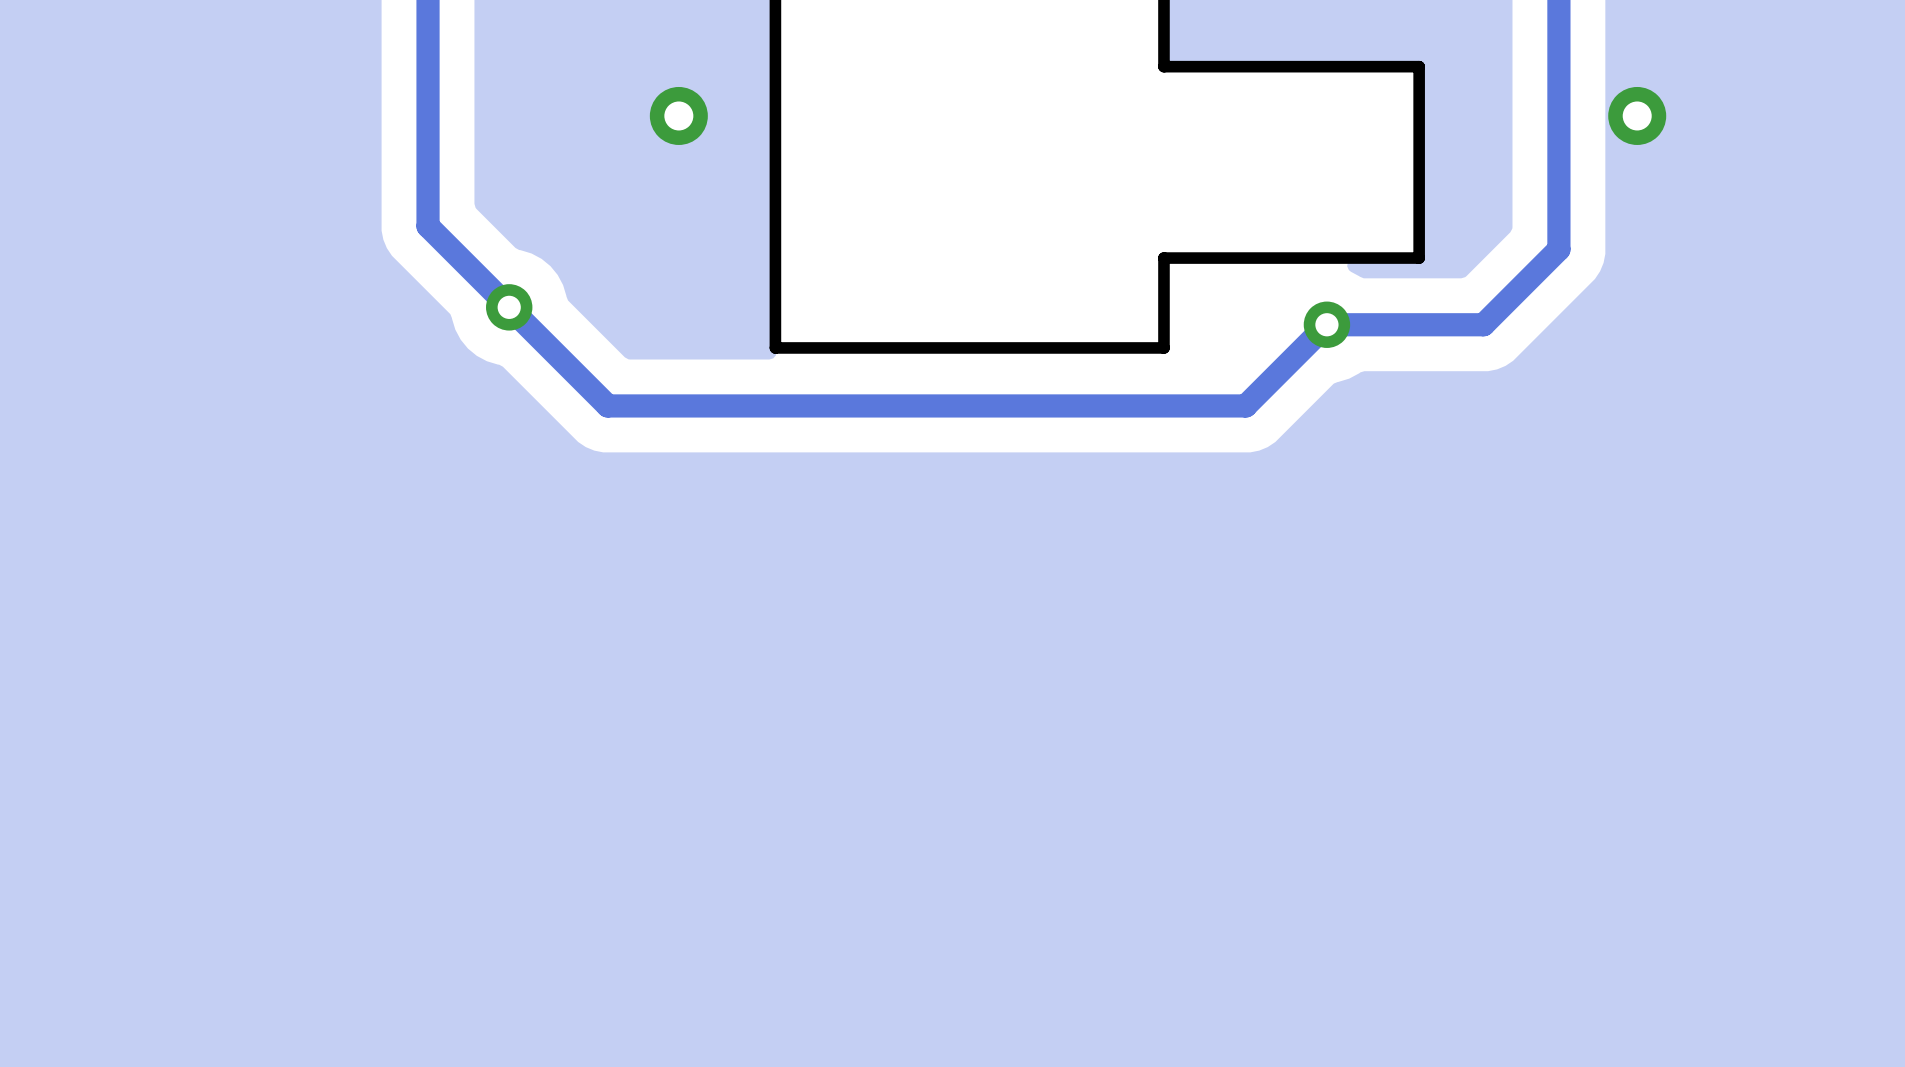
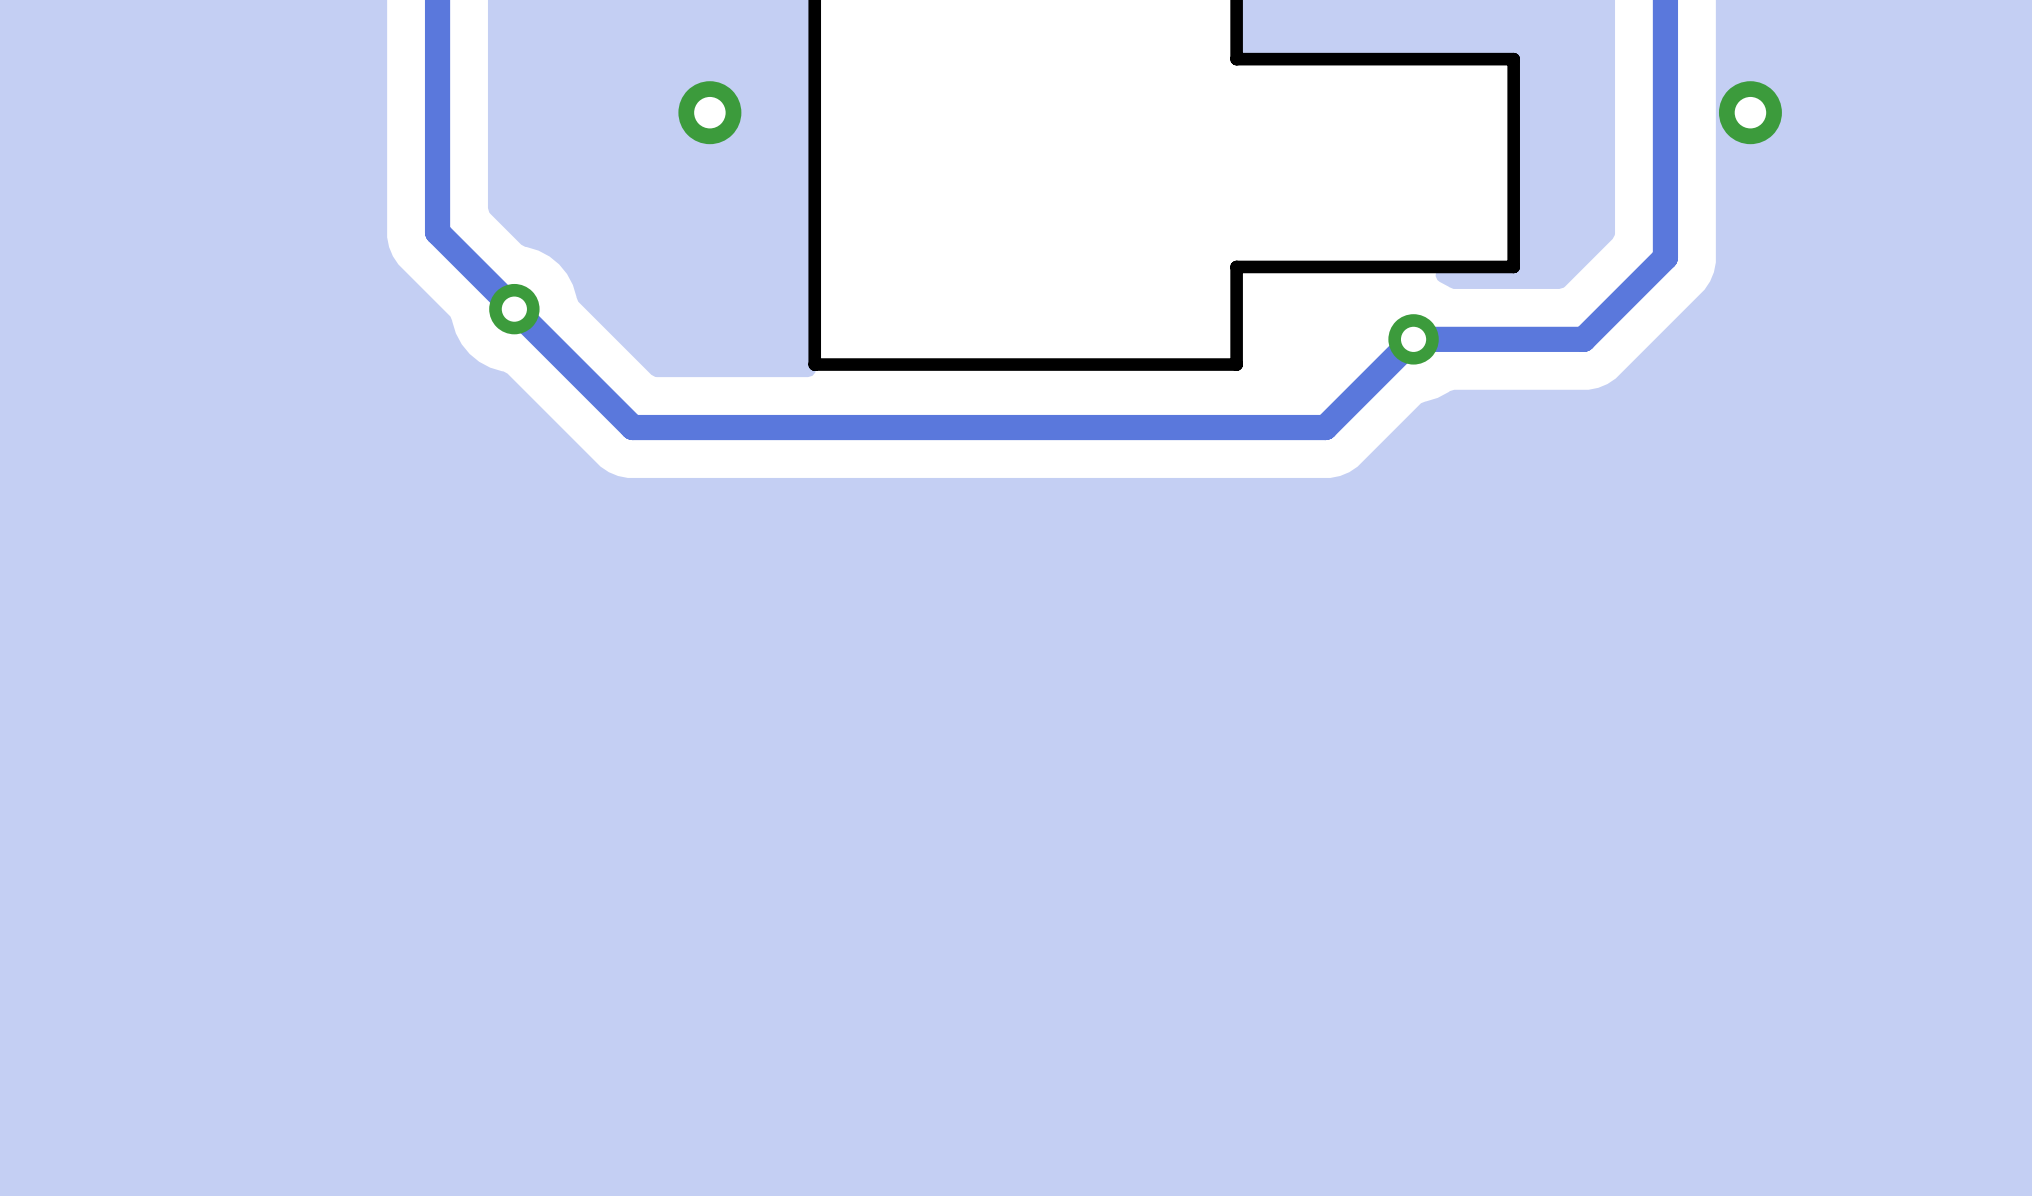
via position: (509, 307) -> (514, 309)

